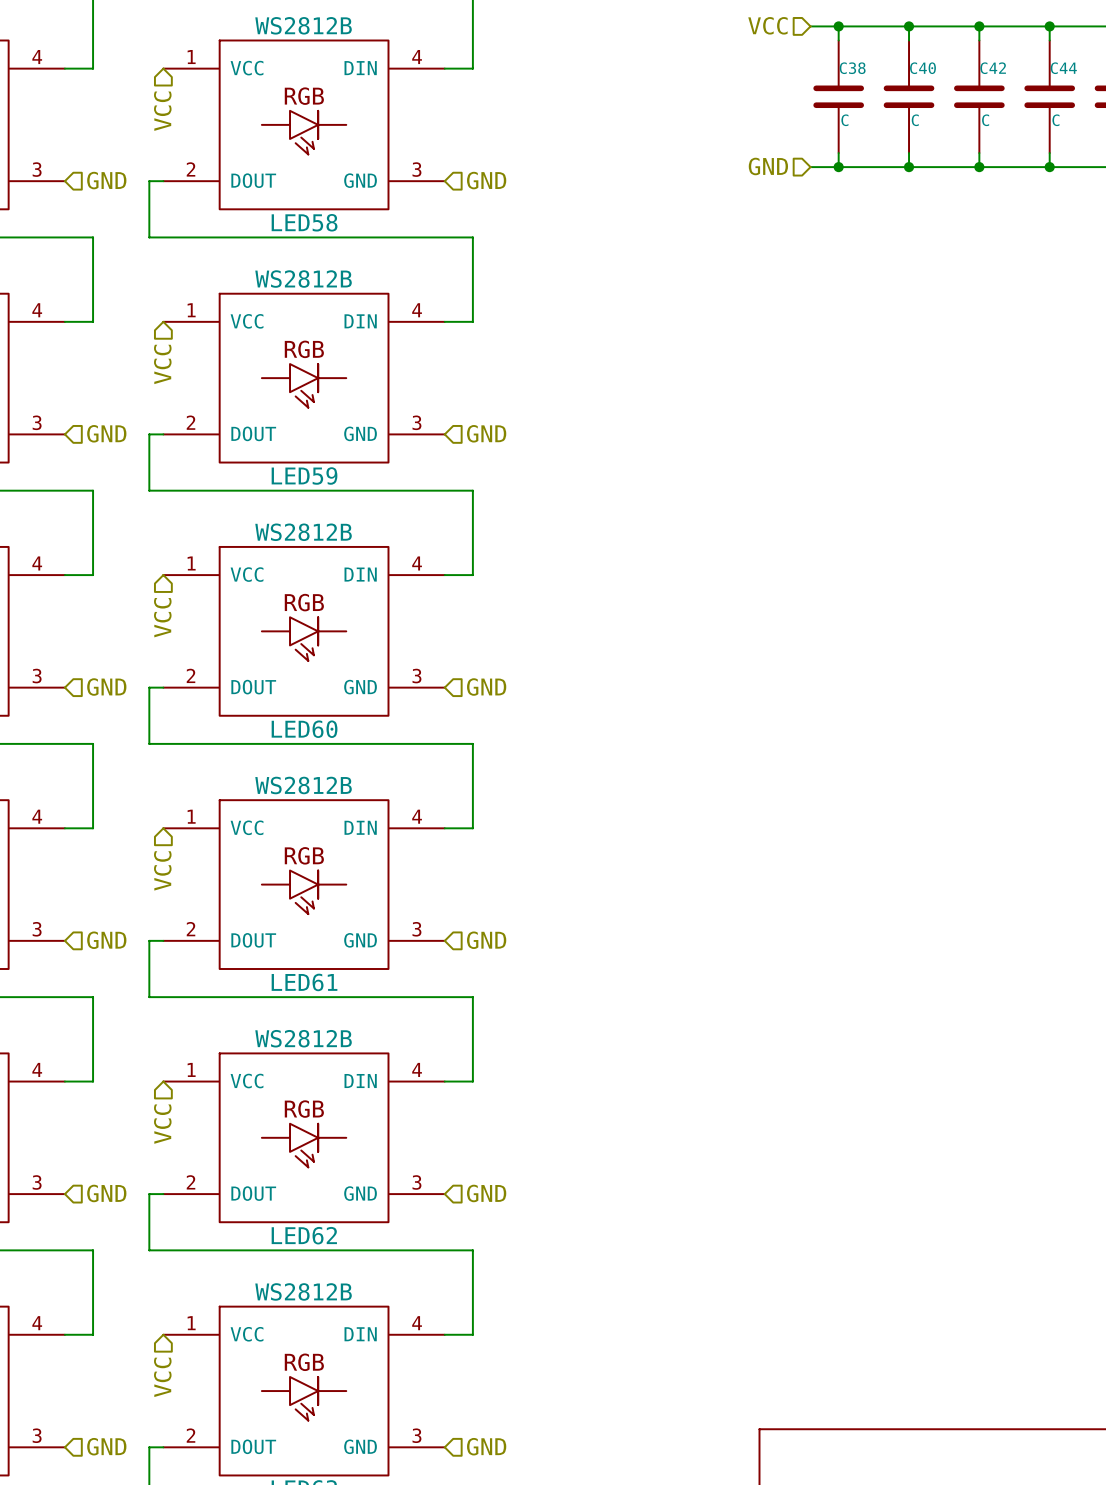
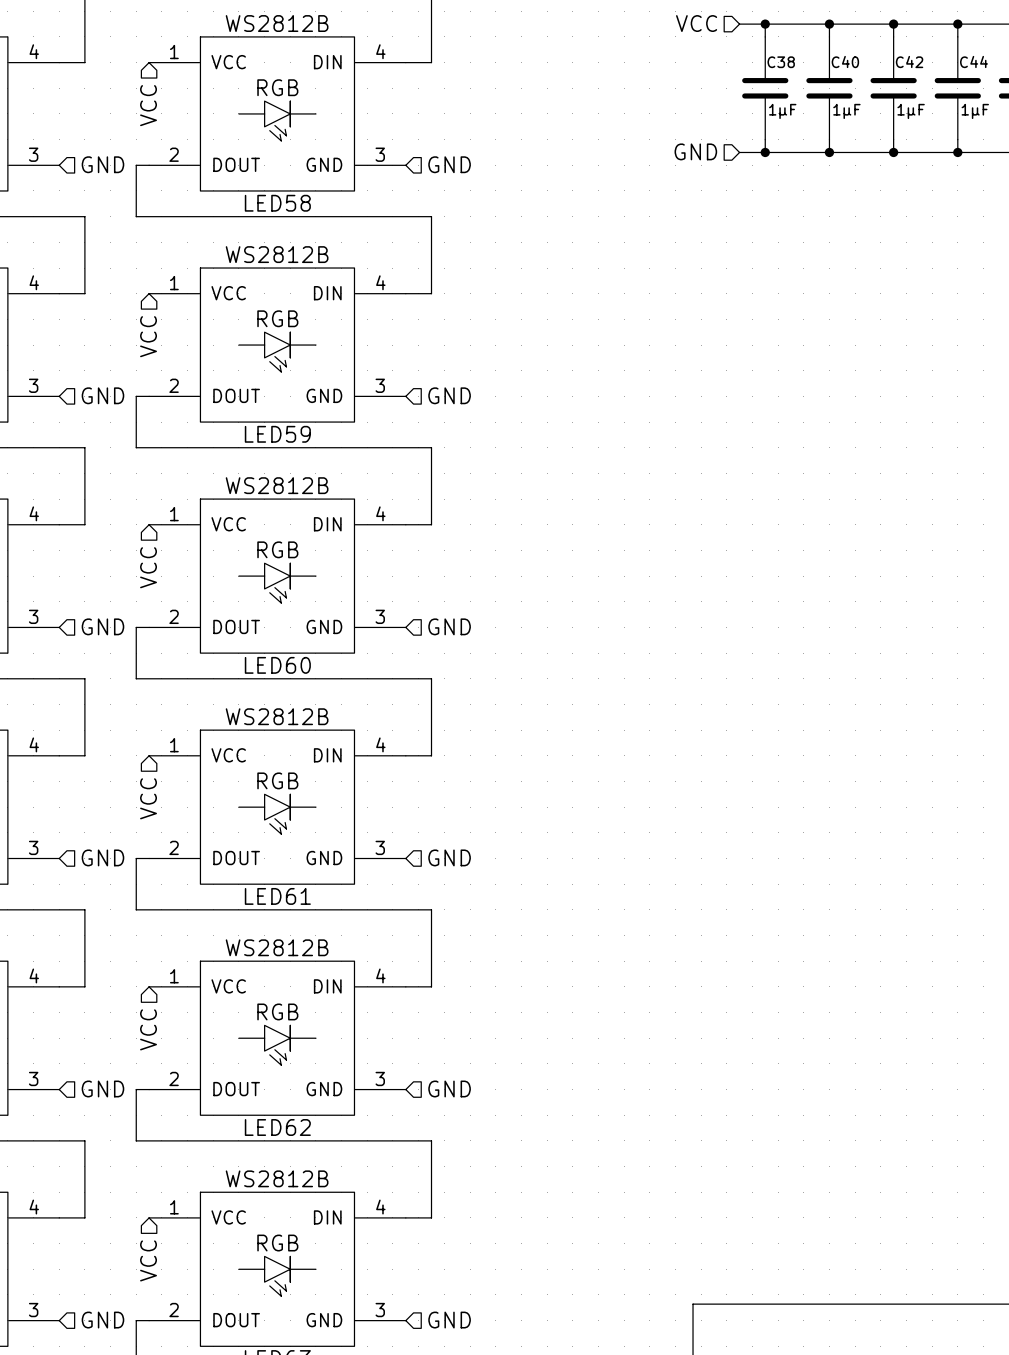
C38 value: C (844, 120) -> 1µF (782, 111)
C40 value: C (915, 120) -> 1µF (846, 111)
C42 value: C (985, 120) -> 1µF (911, 111)
C44 value: C (1055, 120) -> 1µF (975, 111)

